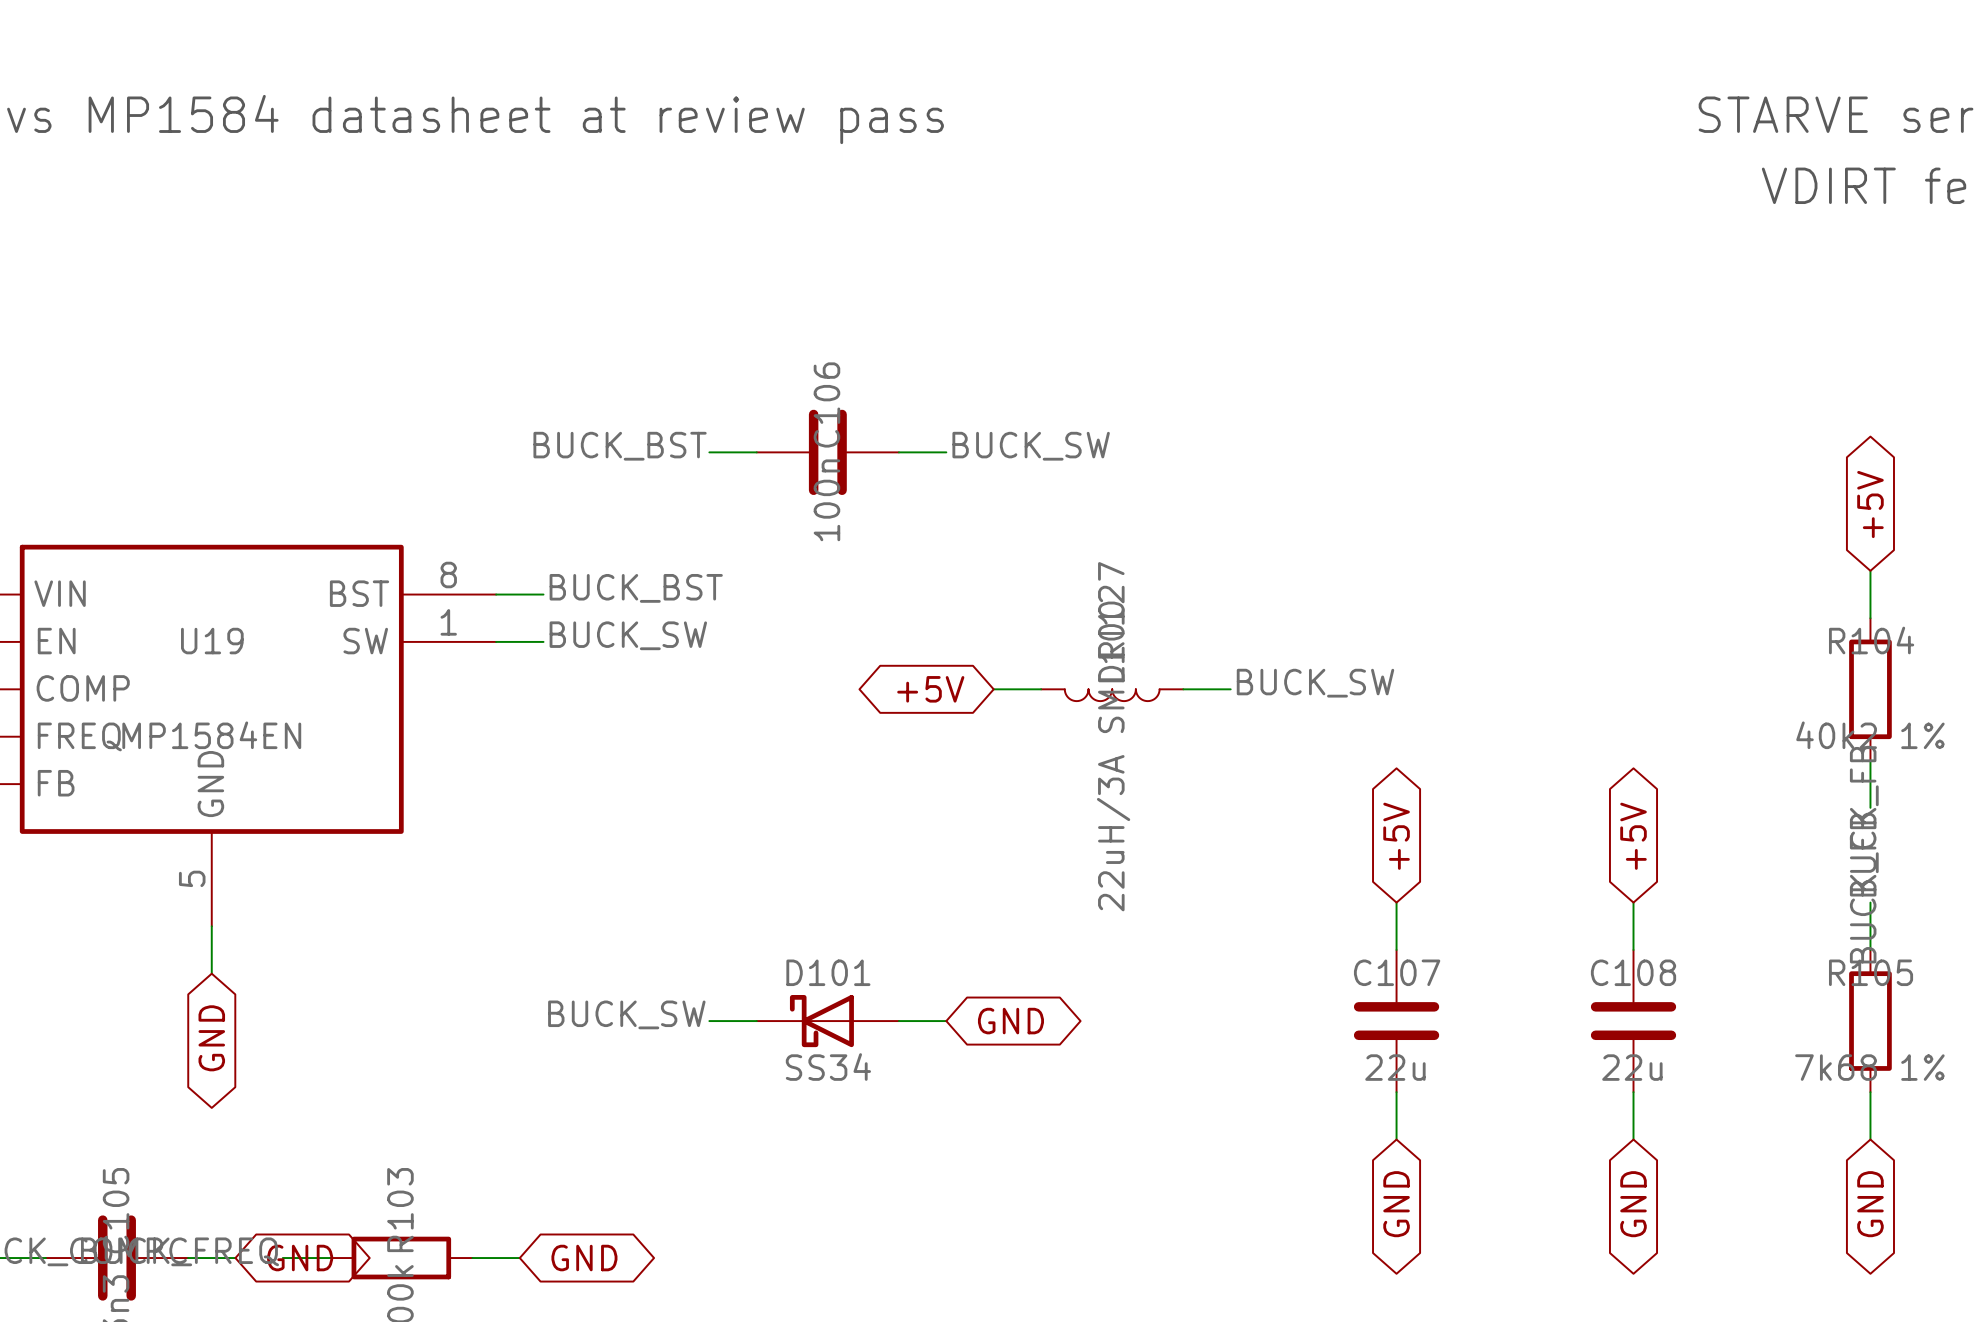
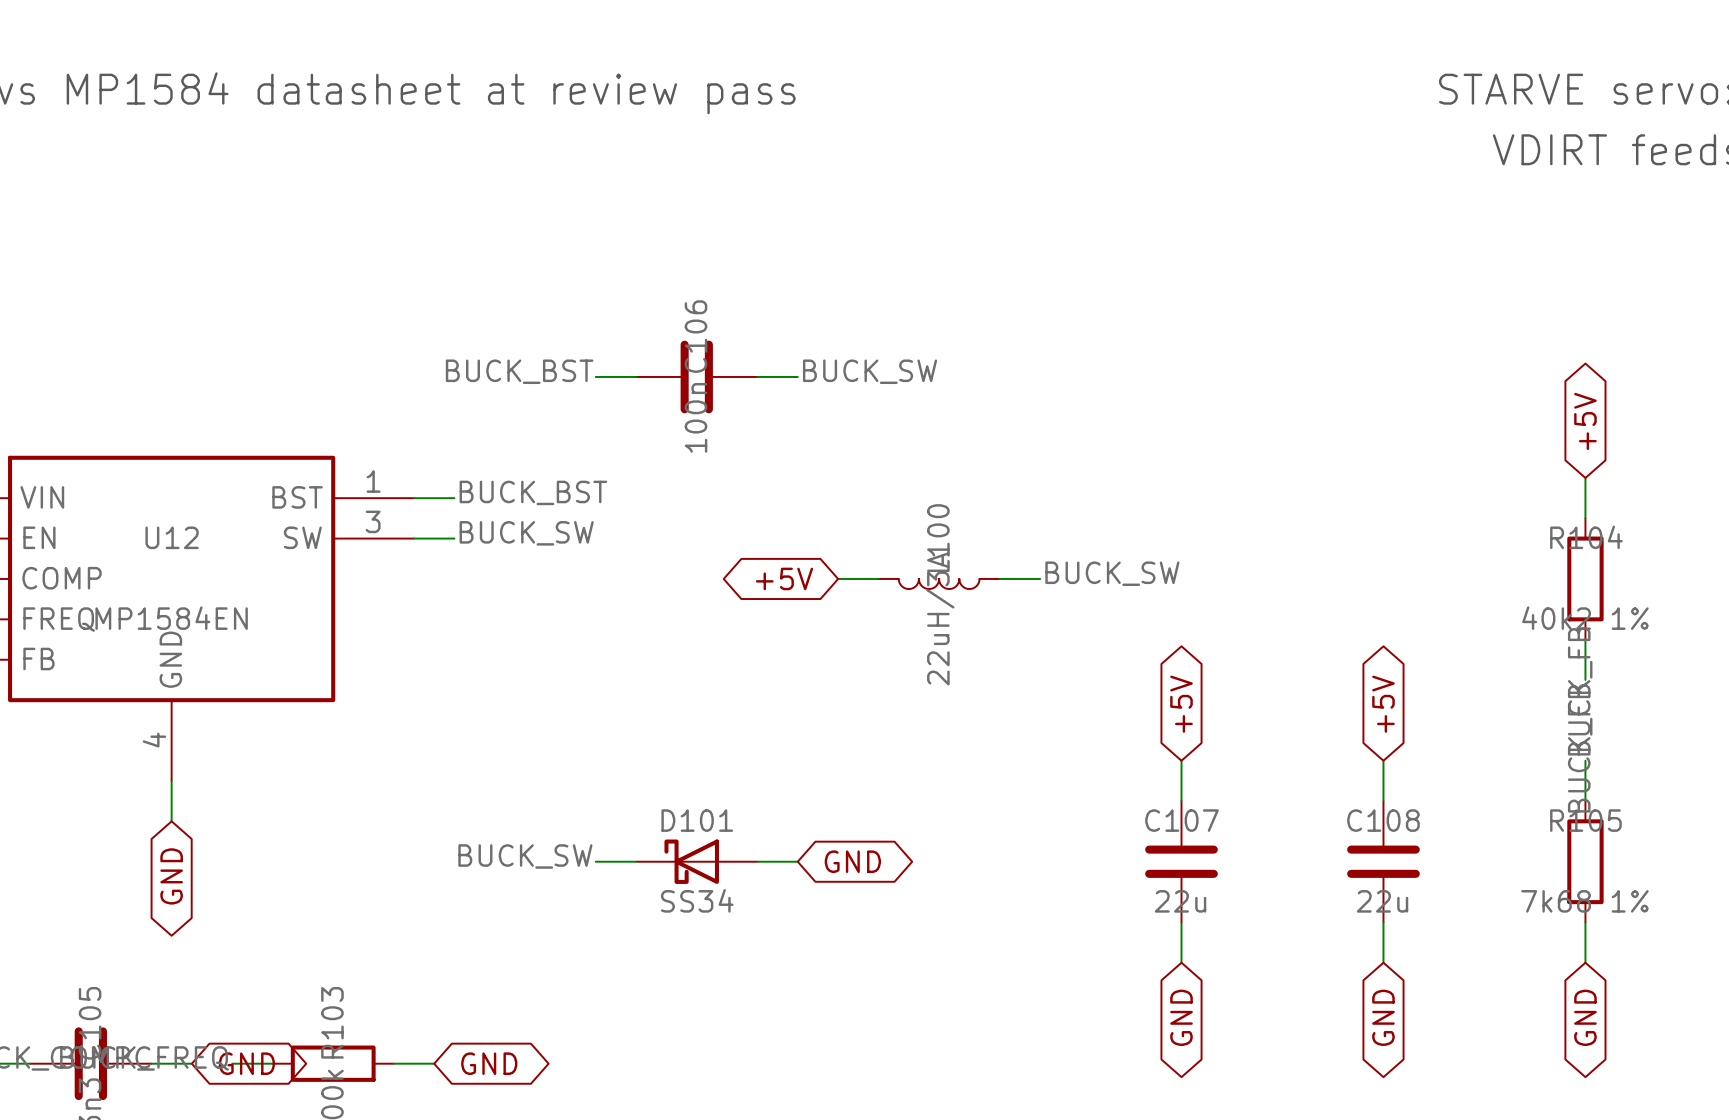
U19 pin number: 8 (448, 574) -> 1 (373, 481)
U19 pin number: 1 (448, 622) -> 3 (373, 521)
U19 name: U19 (212, 641) -> U12 (172, 537)
L100 value: 22uH/3A SMDRI127 (1113, 736) -> 22uH/3A (940, 618)
U19 pin number: 5 (192, 878) -> 4 (154, 740)

